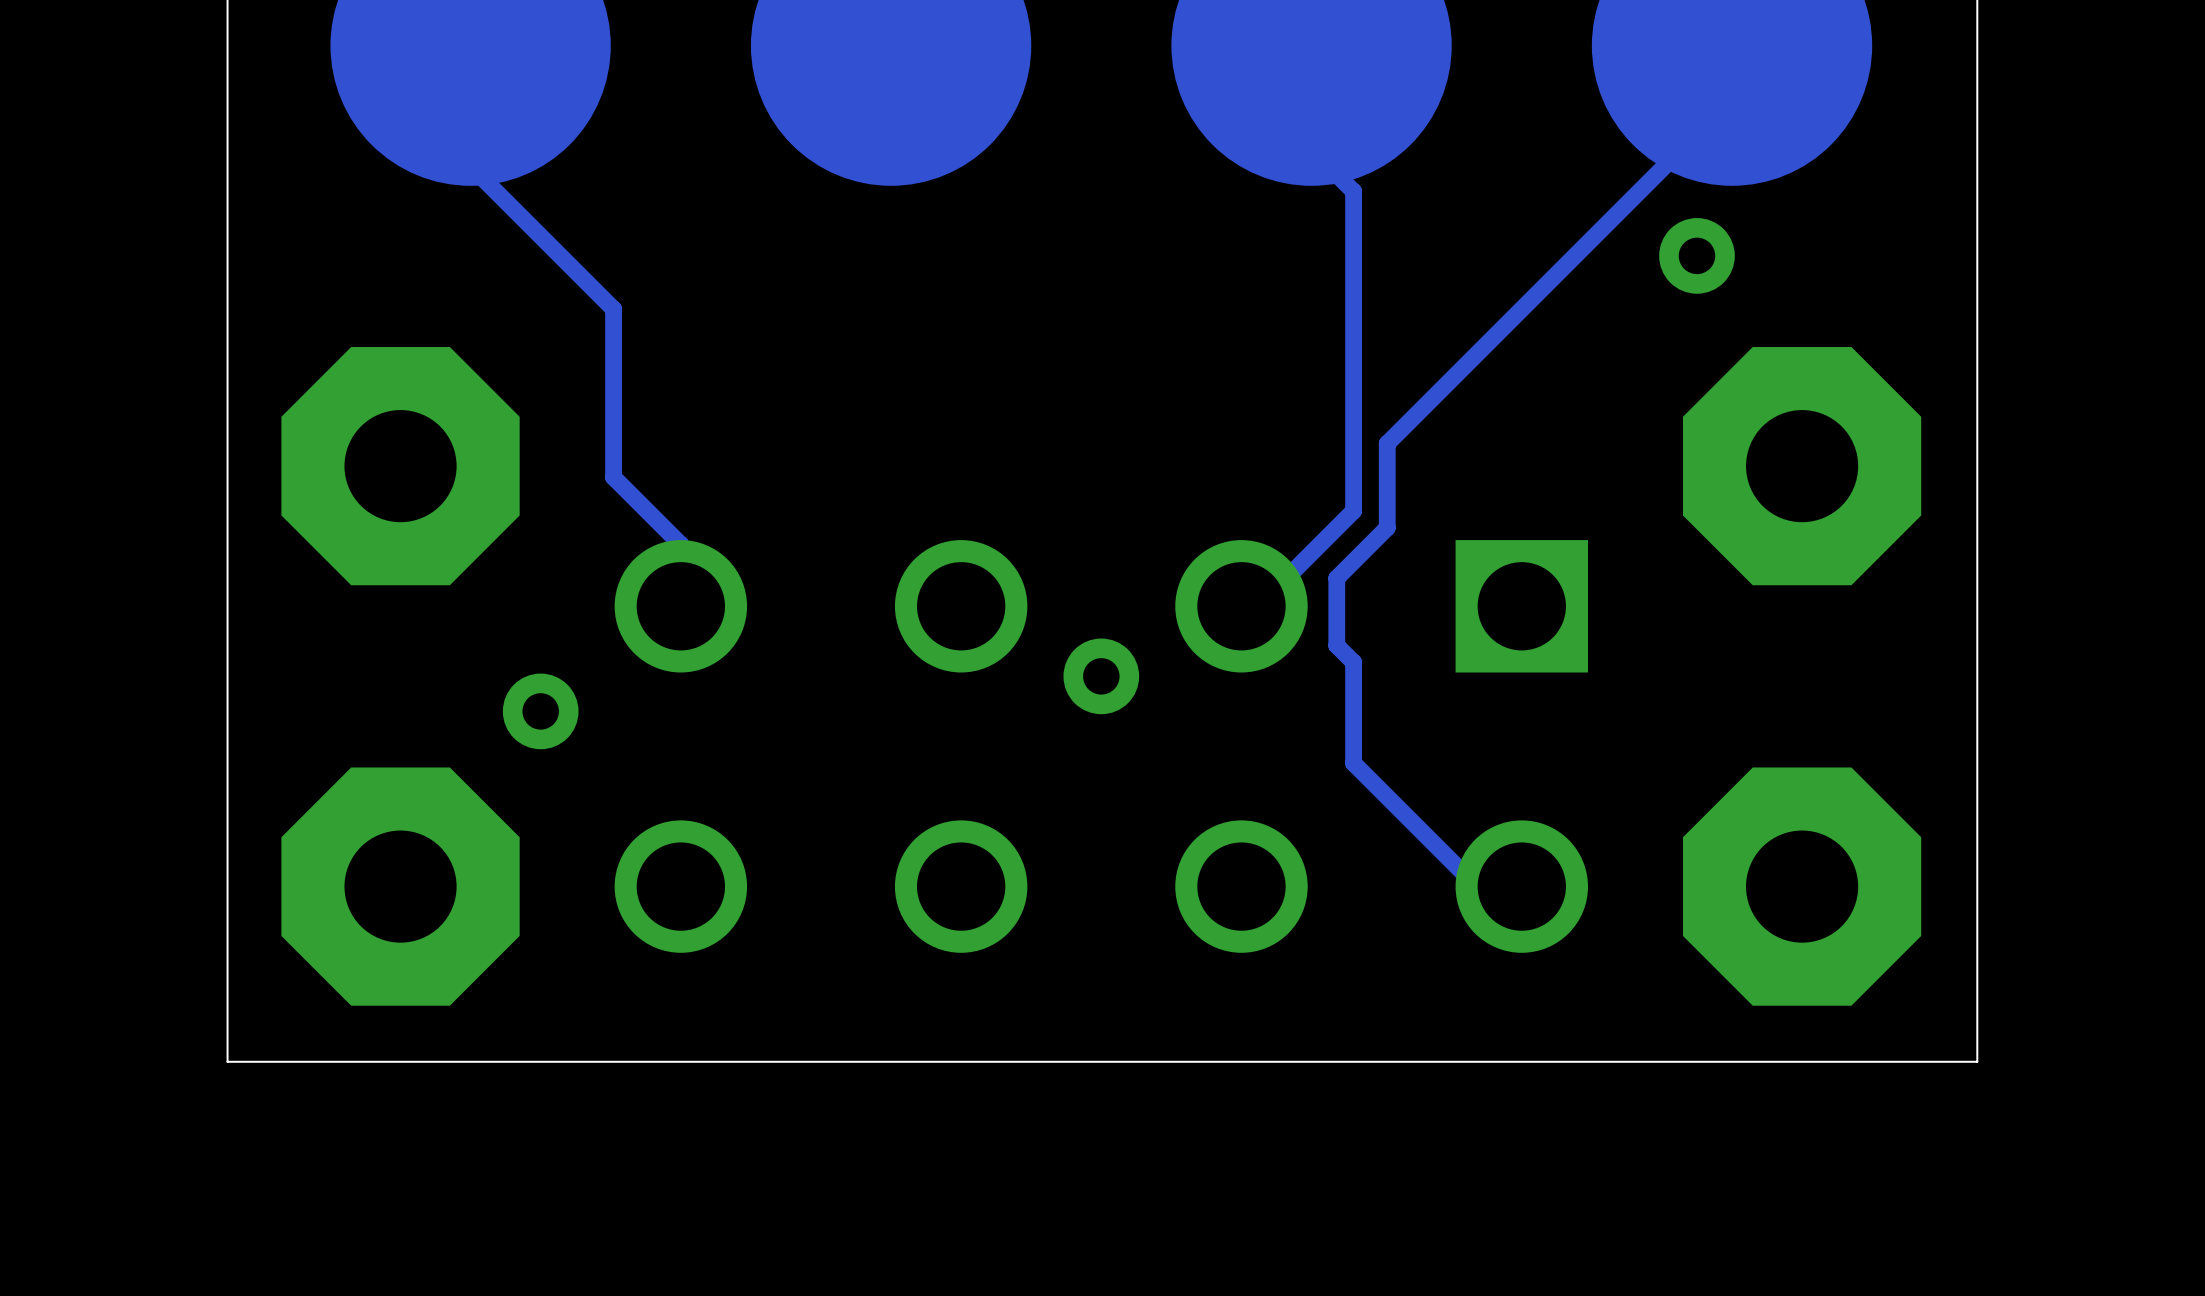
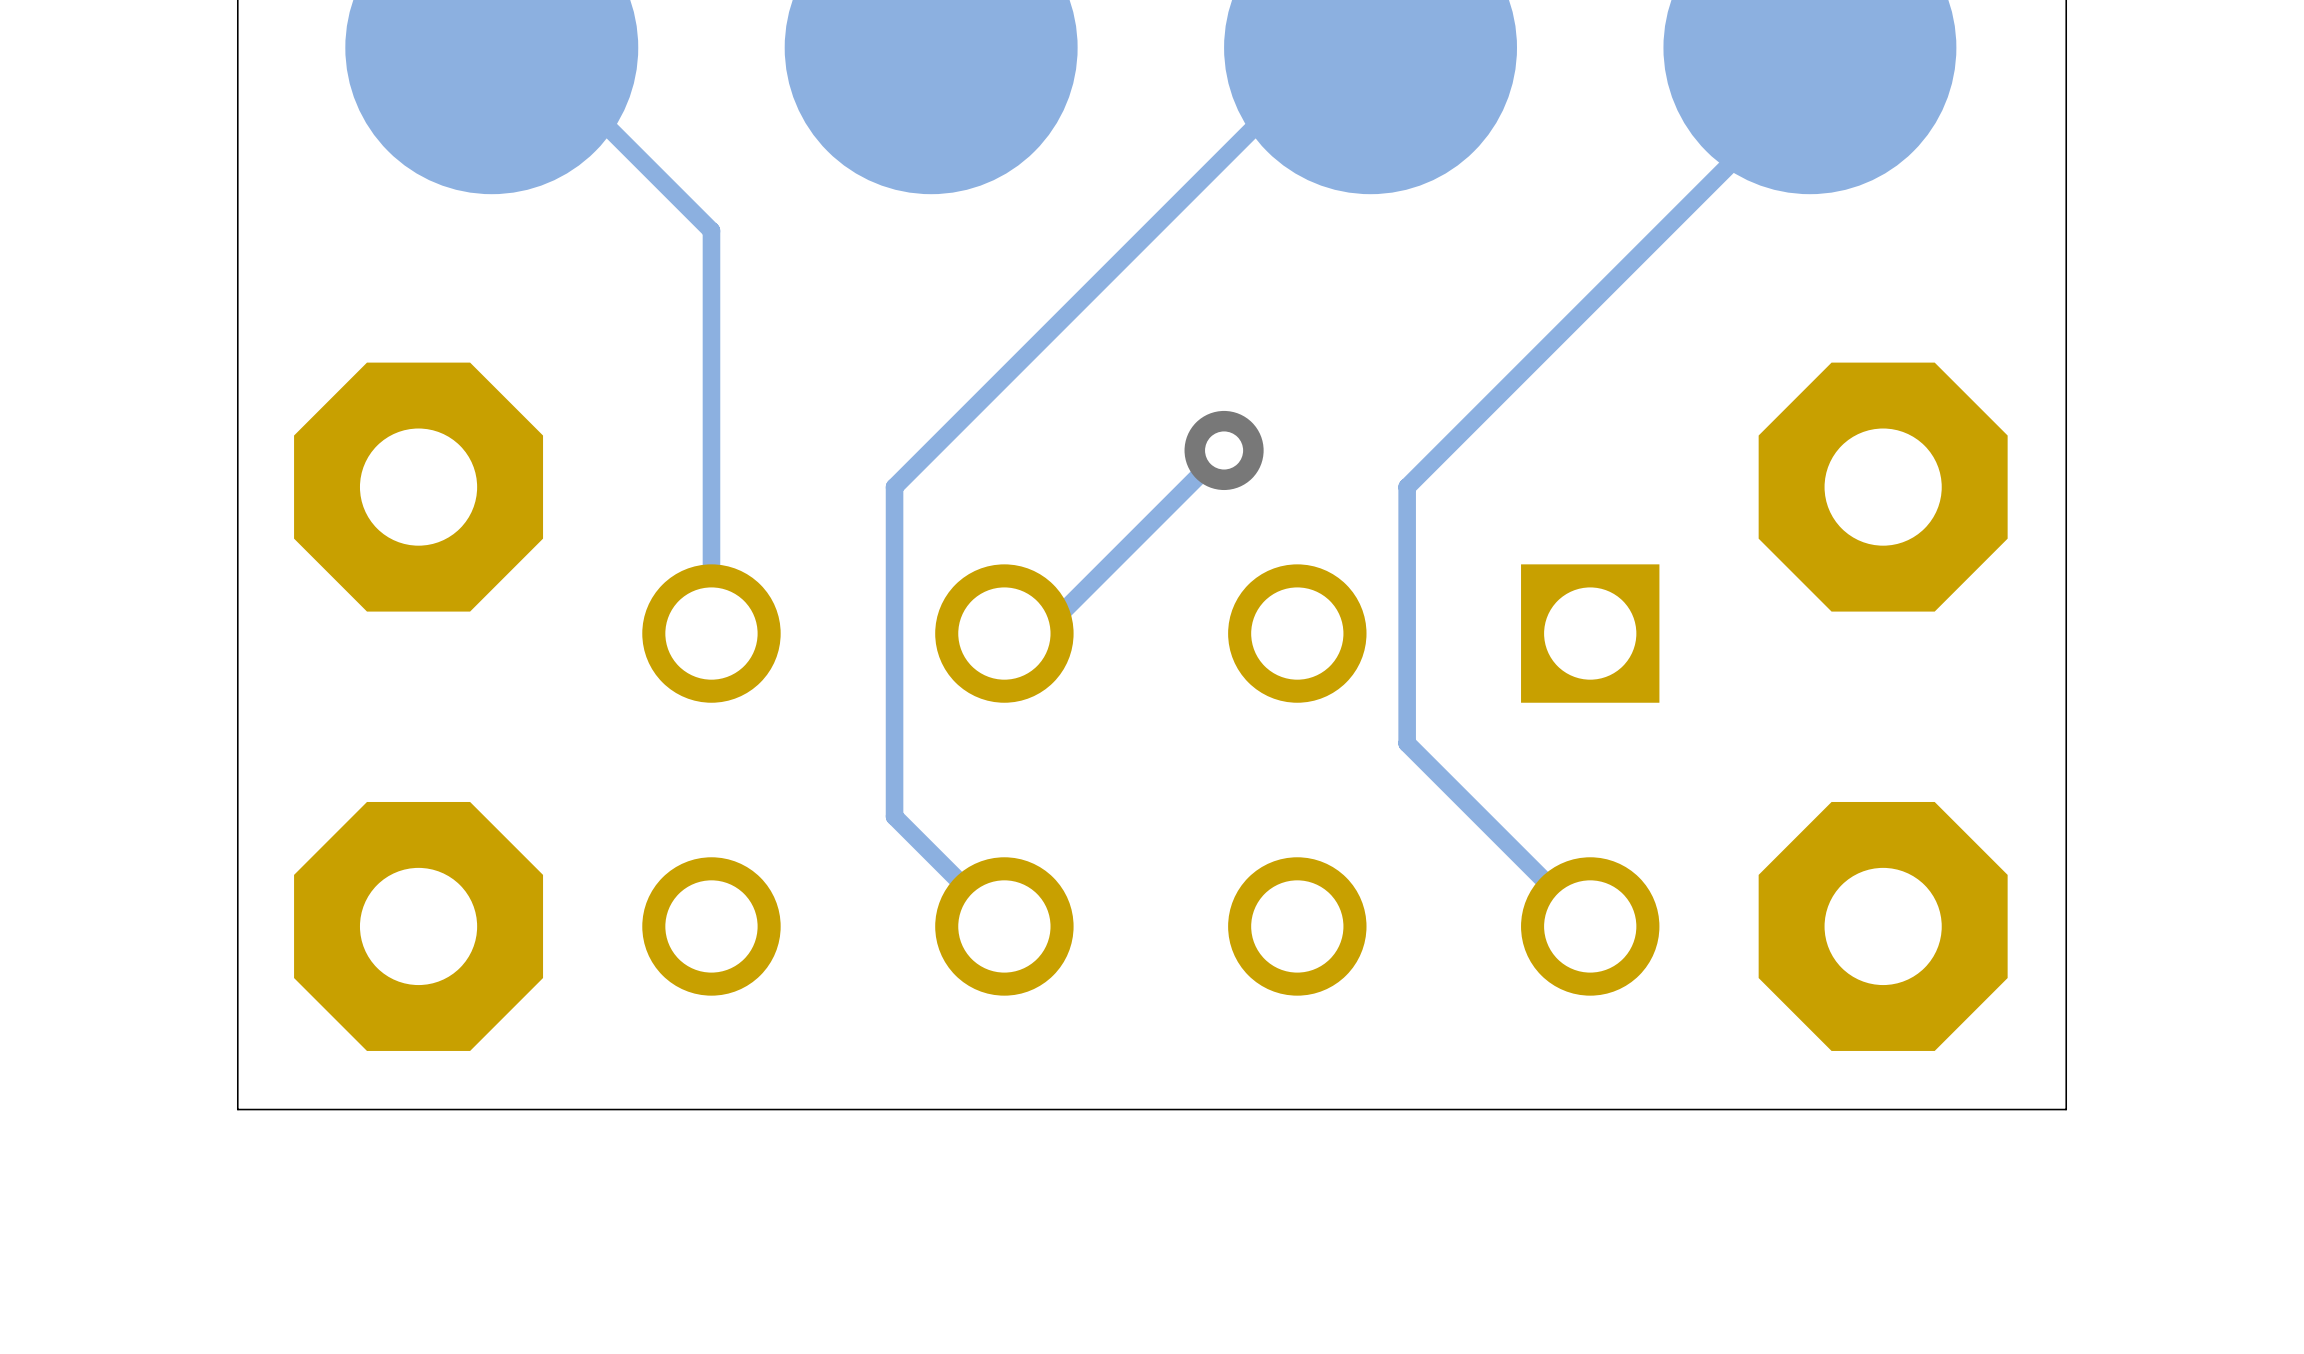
track: (470, 45) (479, 56) (479, 174) (613, 309) (613, 477) (680, 544) -> (491, 47) (528, 47) (711, 230) (711, 569)
track: (1311, 45) (1319, 56) (1319, 157) (1353, 191) (1353, 510) (1269, 595) (1252, 595) (1241, 606) -> (1370, 47) (1333, 47) (894, 487) (894, 816) (1004, 926)
track: (1732, 45) (1723, 56) (1723, 107) (1387, 443) (1387, 527) (1336, 578) (1336, 645) (1353, 662) (1353, 763) (1471, 880) (1521, 880) (1521, 886) -> (1809, 47) (1809, 84) (1407, 487) (1407, 743) (1590, 926)
via: (1696, 255) -> none
track: none -> (1224, 450) (1041, 633) (1004, 633)
via position: (1101, 676) -> (1224, 450)
via: (540, 711) -> none

